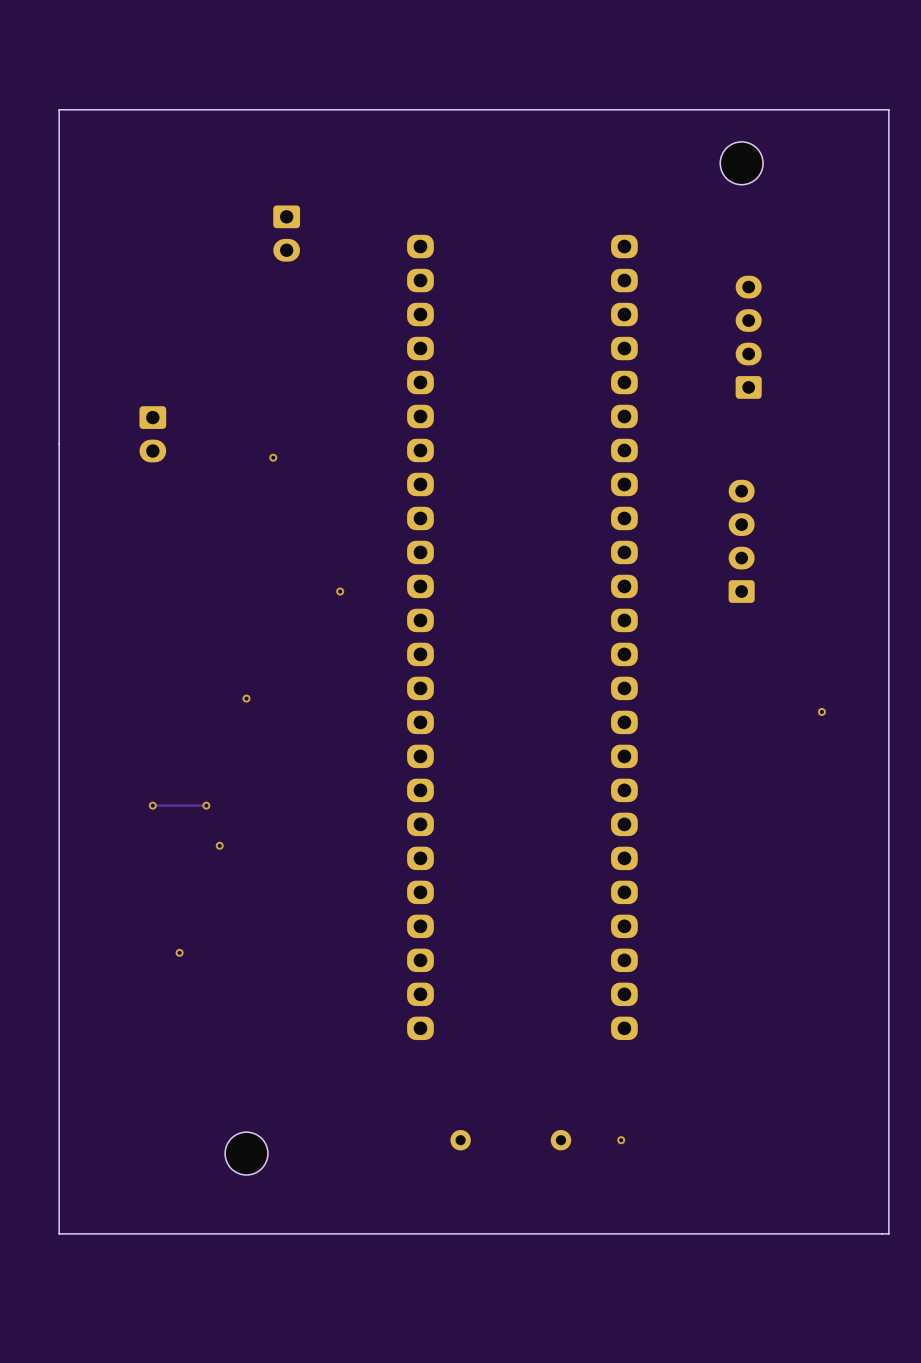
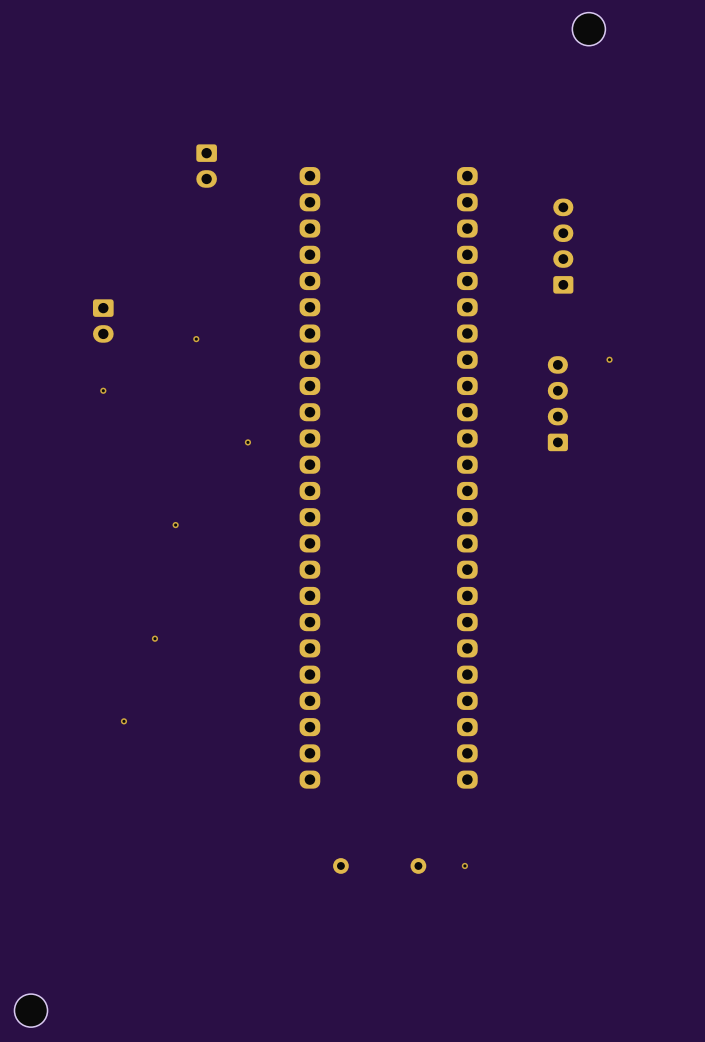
board edge: (888, 109) (888, 1233) (59, 1233) (59, 109) (888, 109) -> none
part position: (741, 163) -> (588, 29)
via: none -> (609, 359)
via: none -> (103, 390)
via: (821, 711) -> none
via: (152, 805) -> none
track: (206, 805) (152, 805) -> none
via: (206, 805) -> none
part position: (246, 1153) -> (31, 1010)

